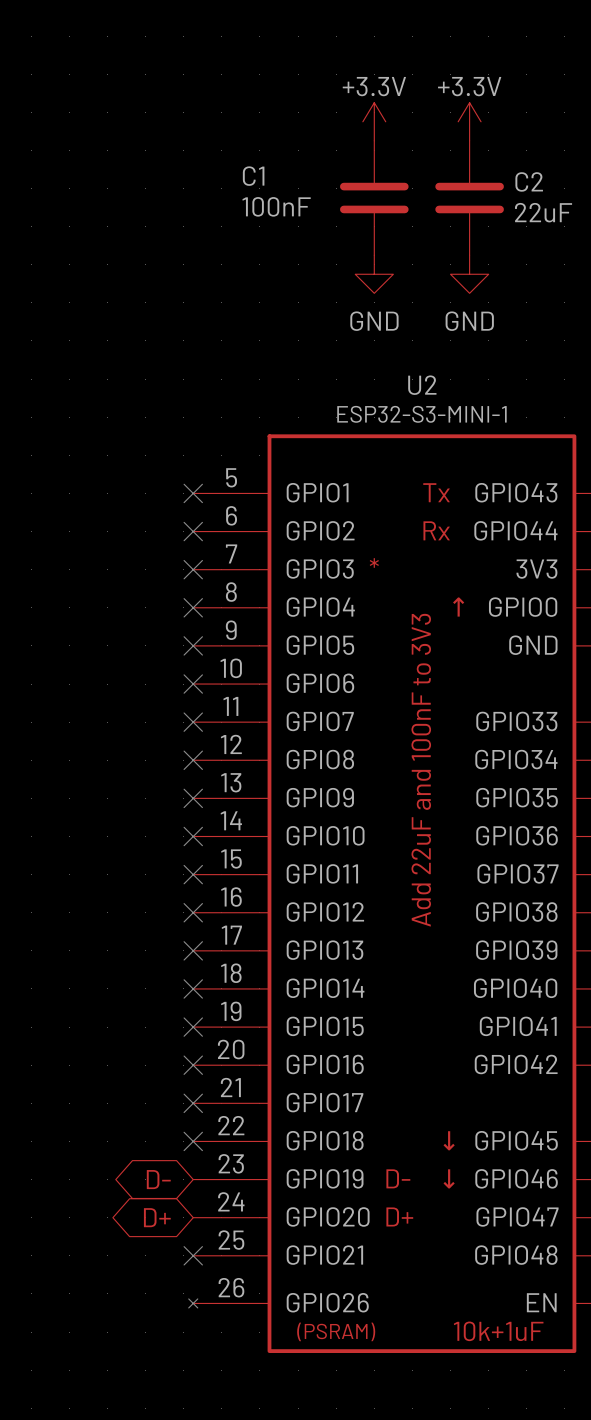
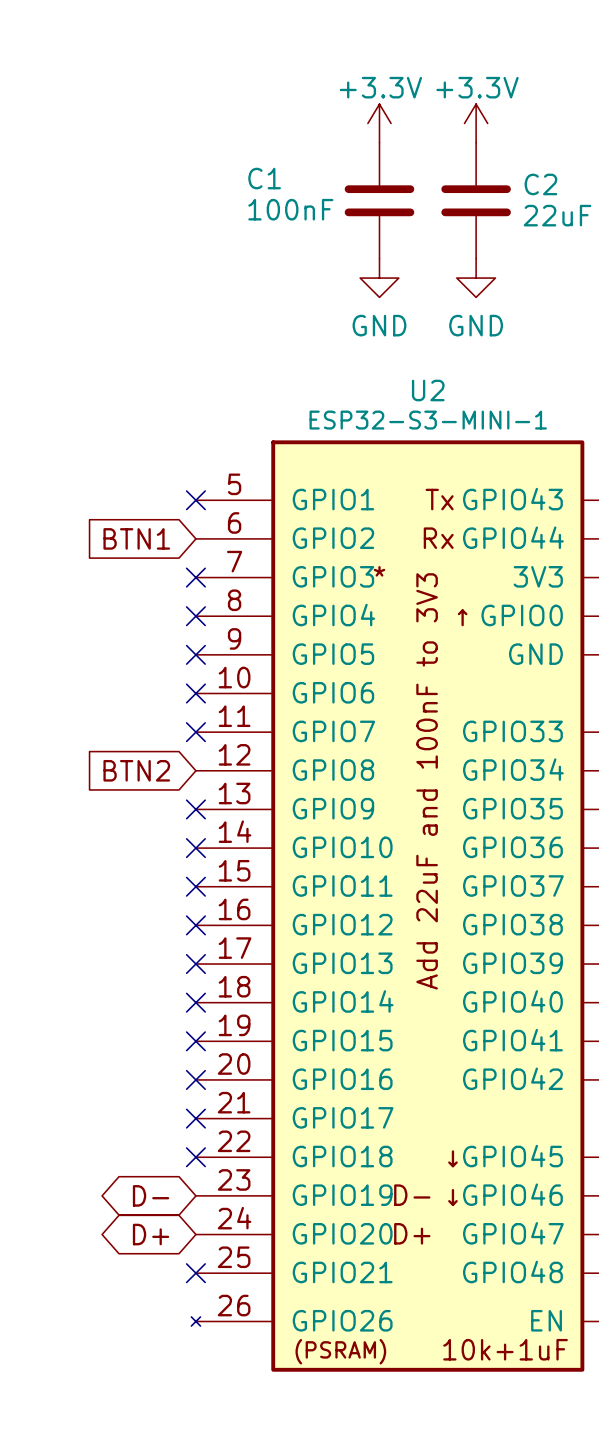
global label: none -> BTN1 (136, 538)
no-connect mark: (193, 531) -> none
global label: none -> BTN2 (136, 770)
no-connect mark: (193, 760) -> none

